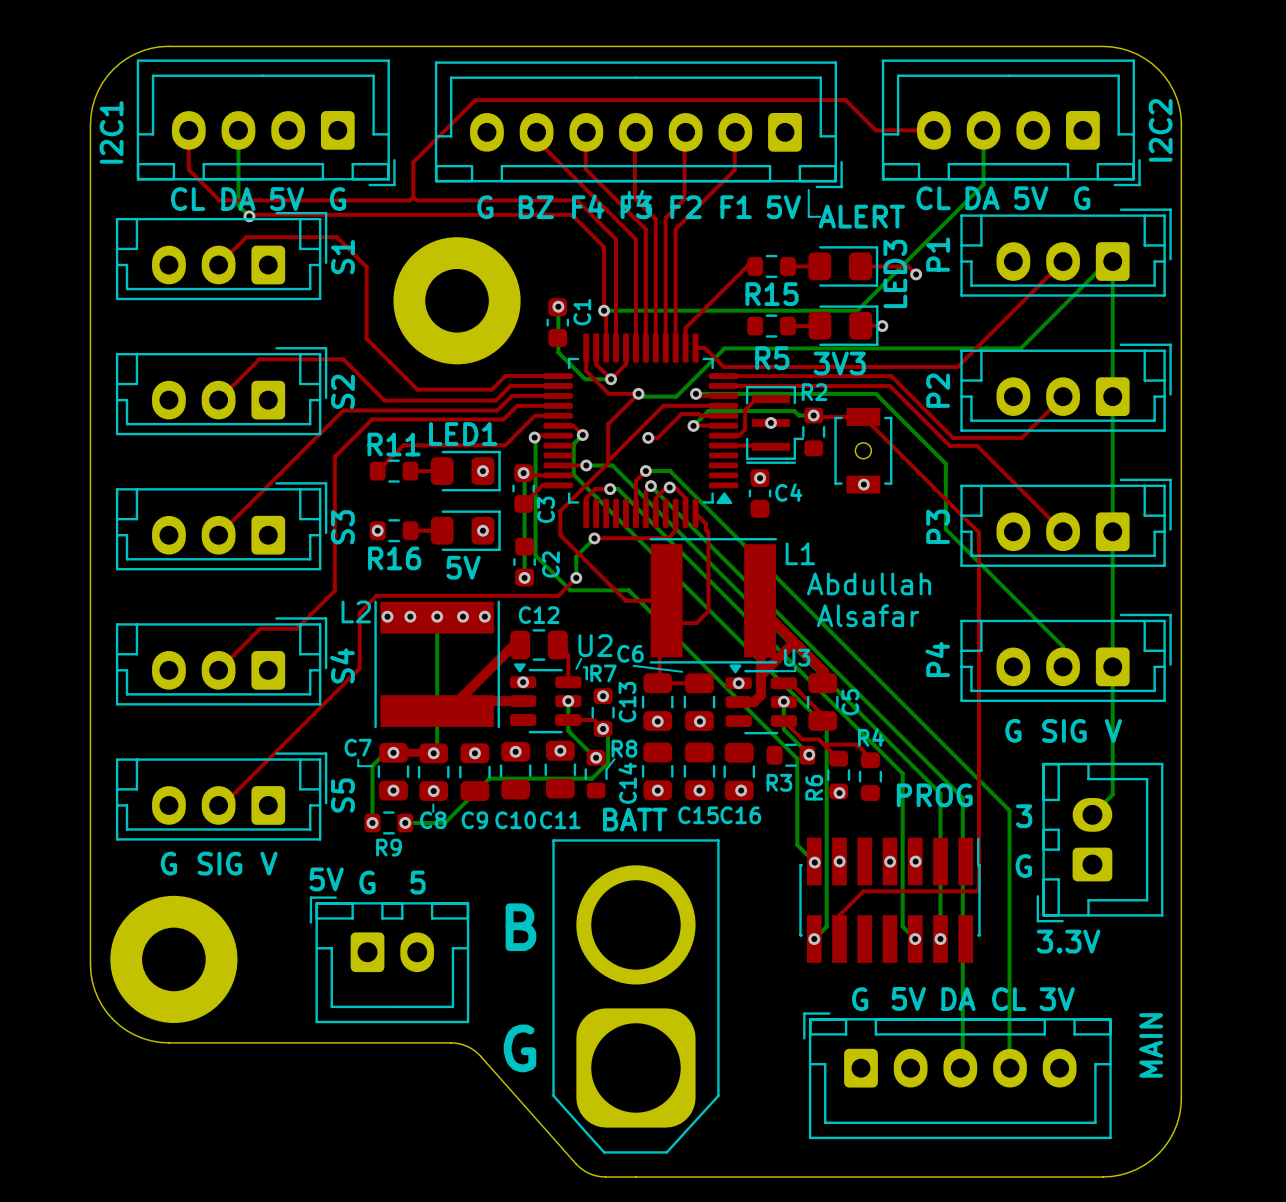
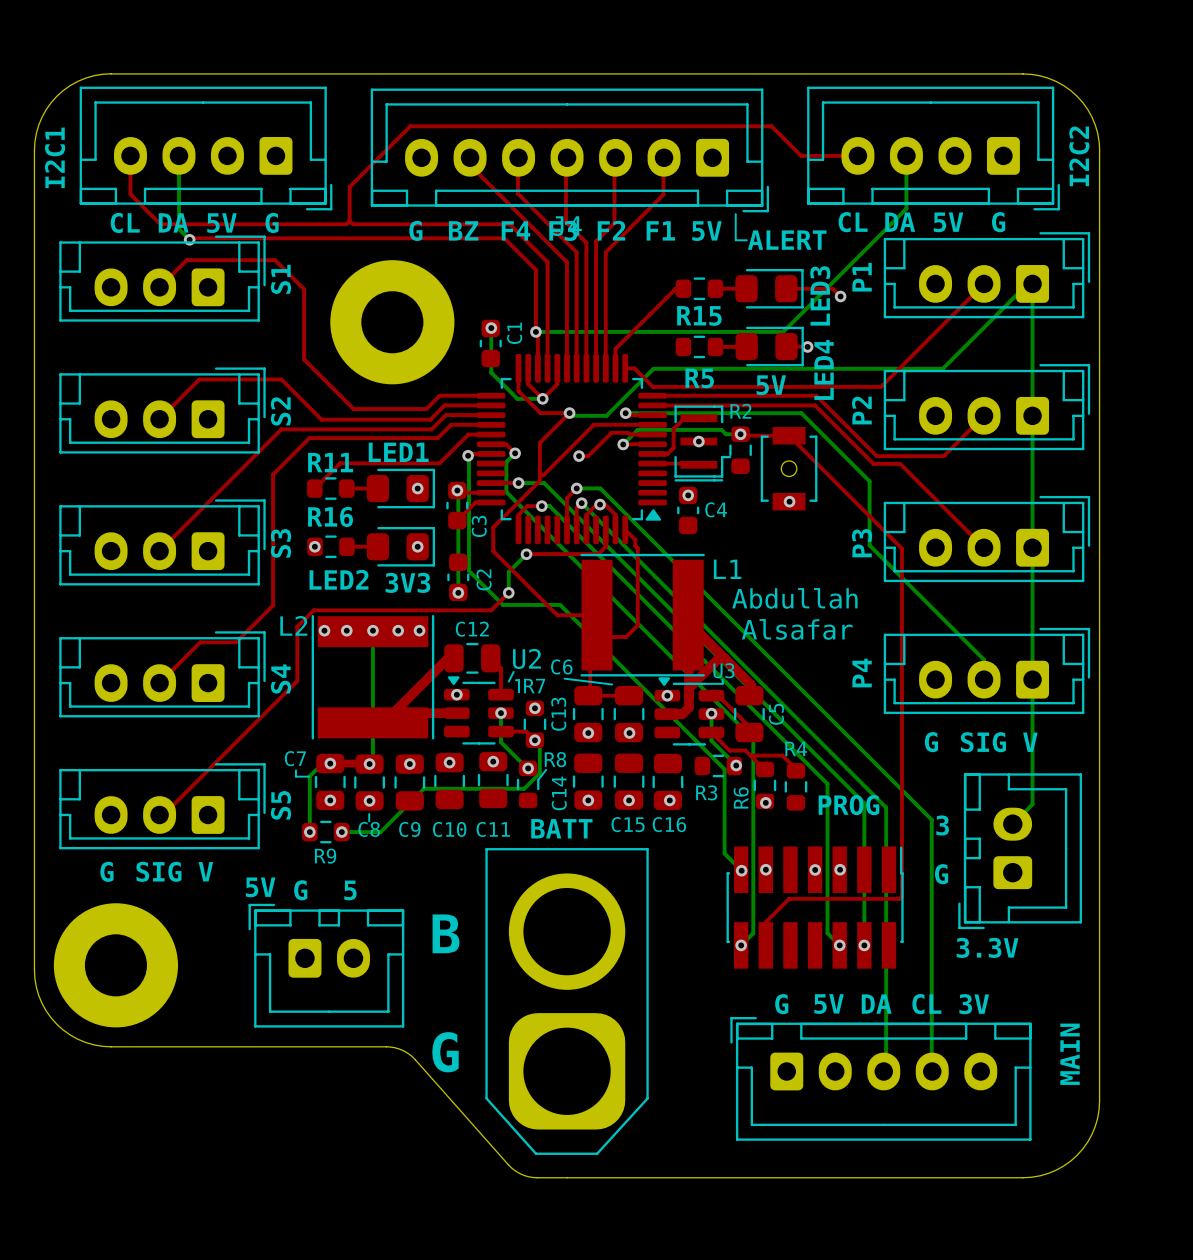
3V3 name: 3V3 (839, 363) -> LED4 (824, 369)
text: none -> 5V (771, 385)
R16 name position: R16 (394, 558) -> R16 (330, 516)
5V name: 5V (463, 567) -> LED2 (338, 579)
text: none -> 3V3 (407, 582)

